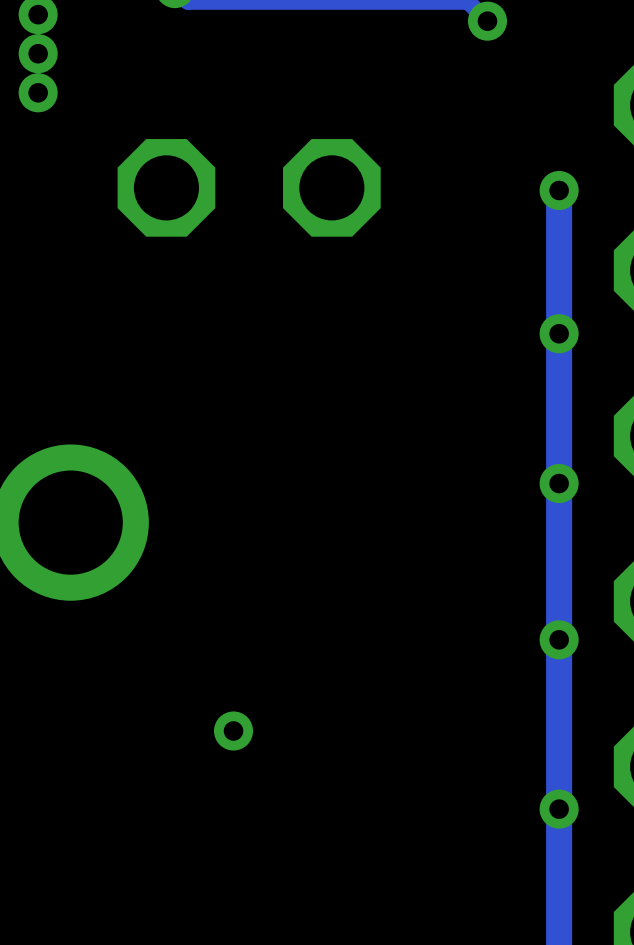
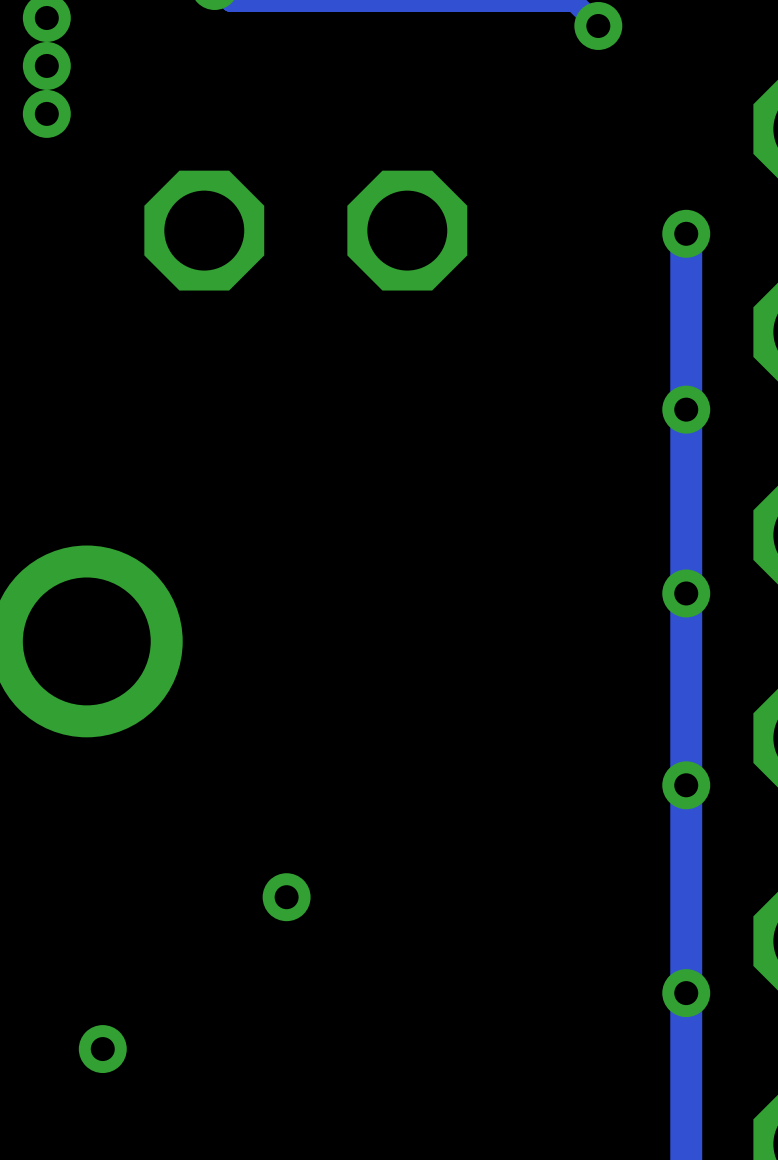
via: none -> (102, 1049)

